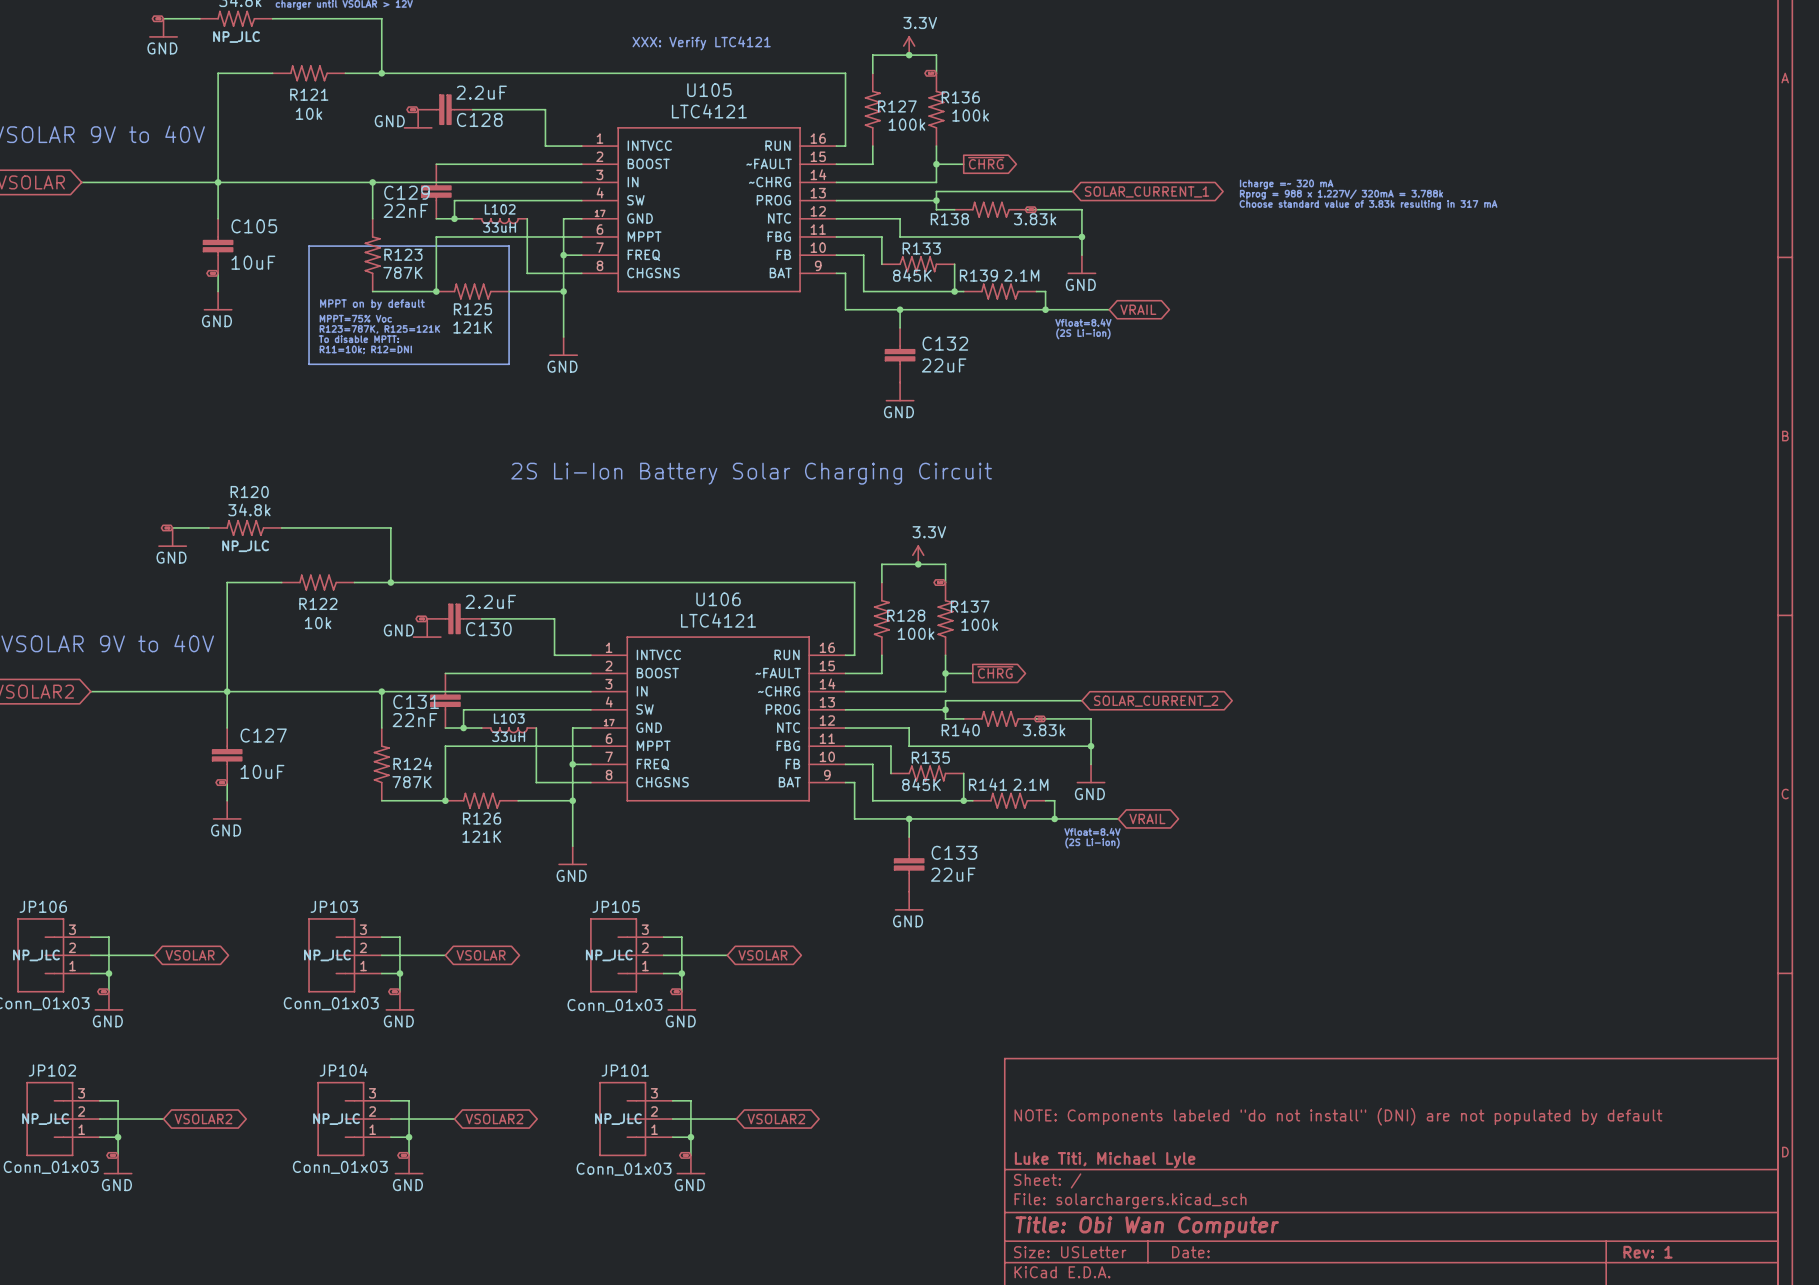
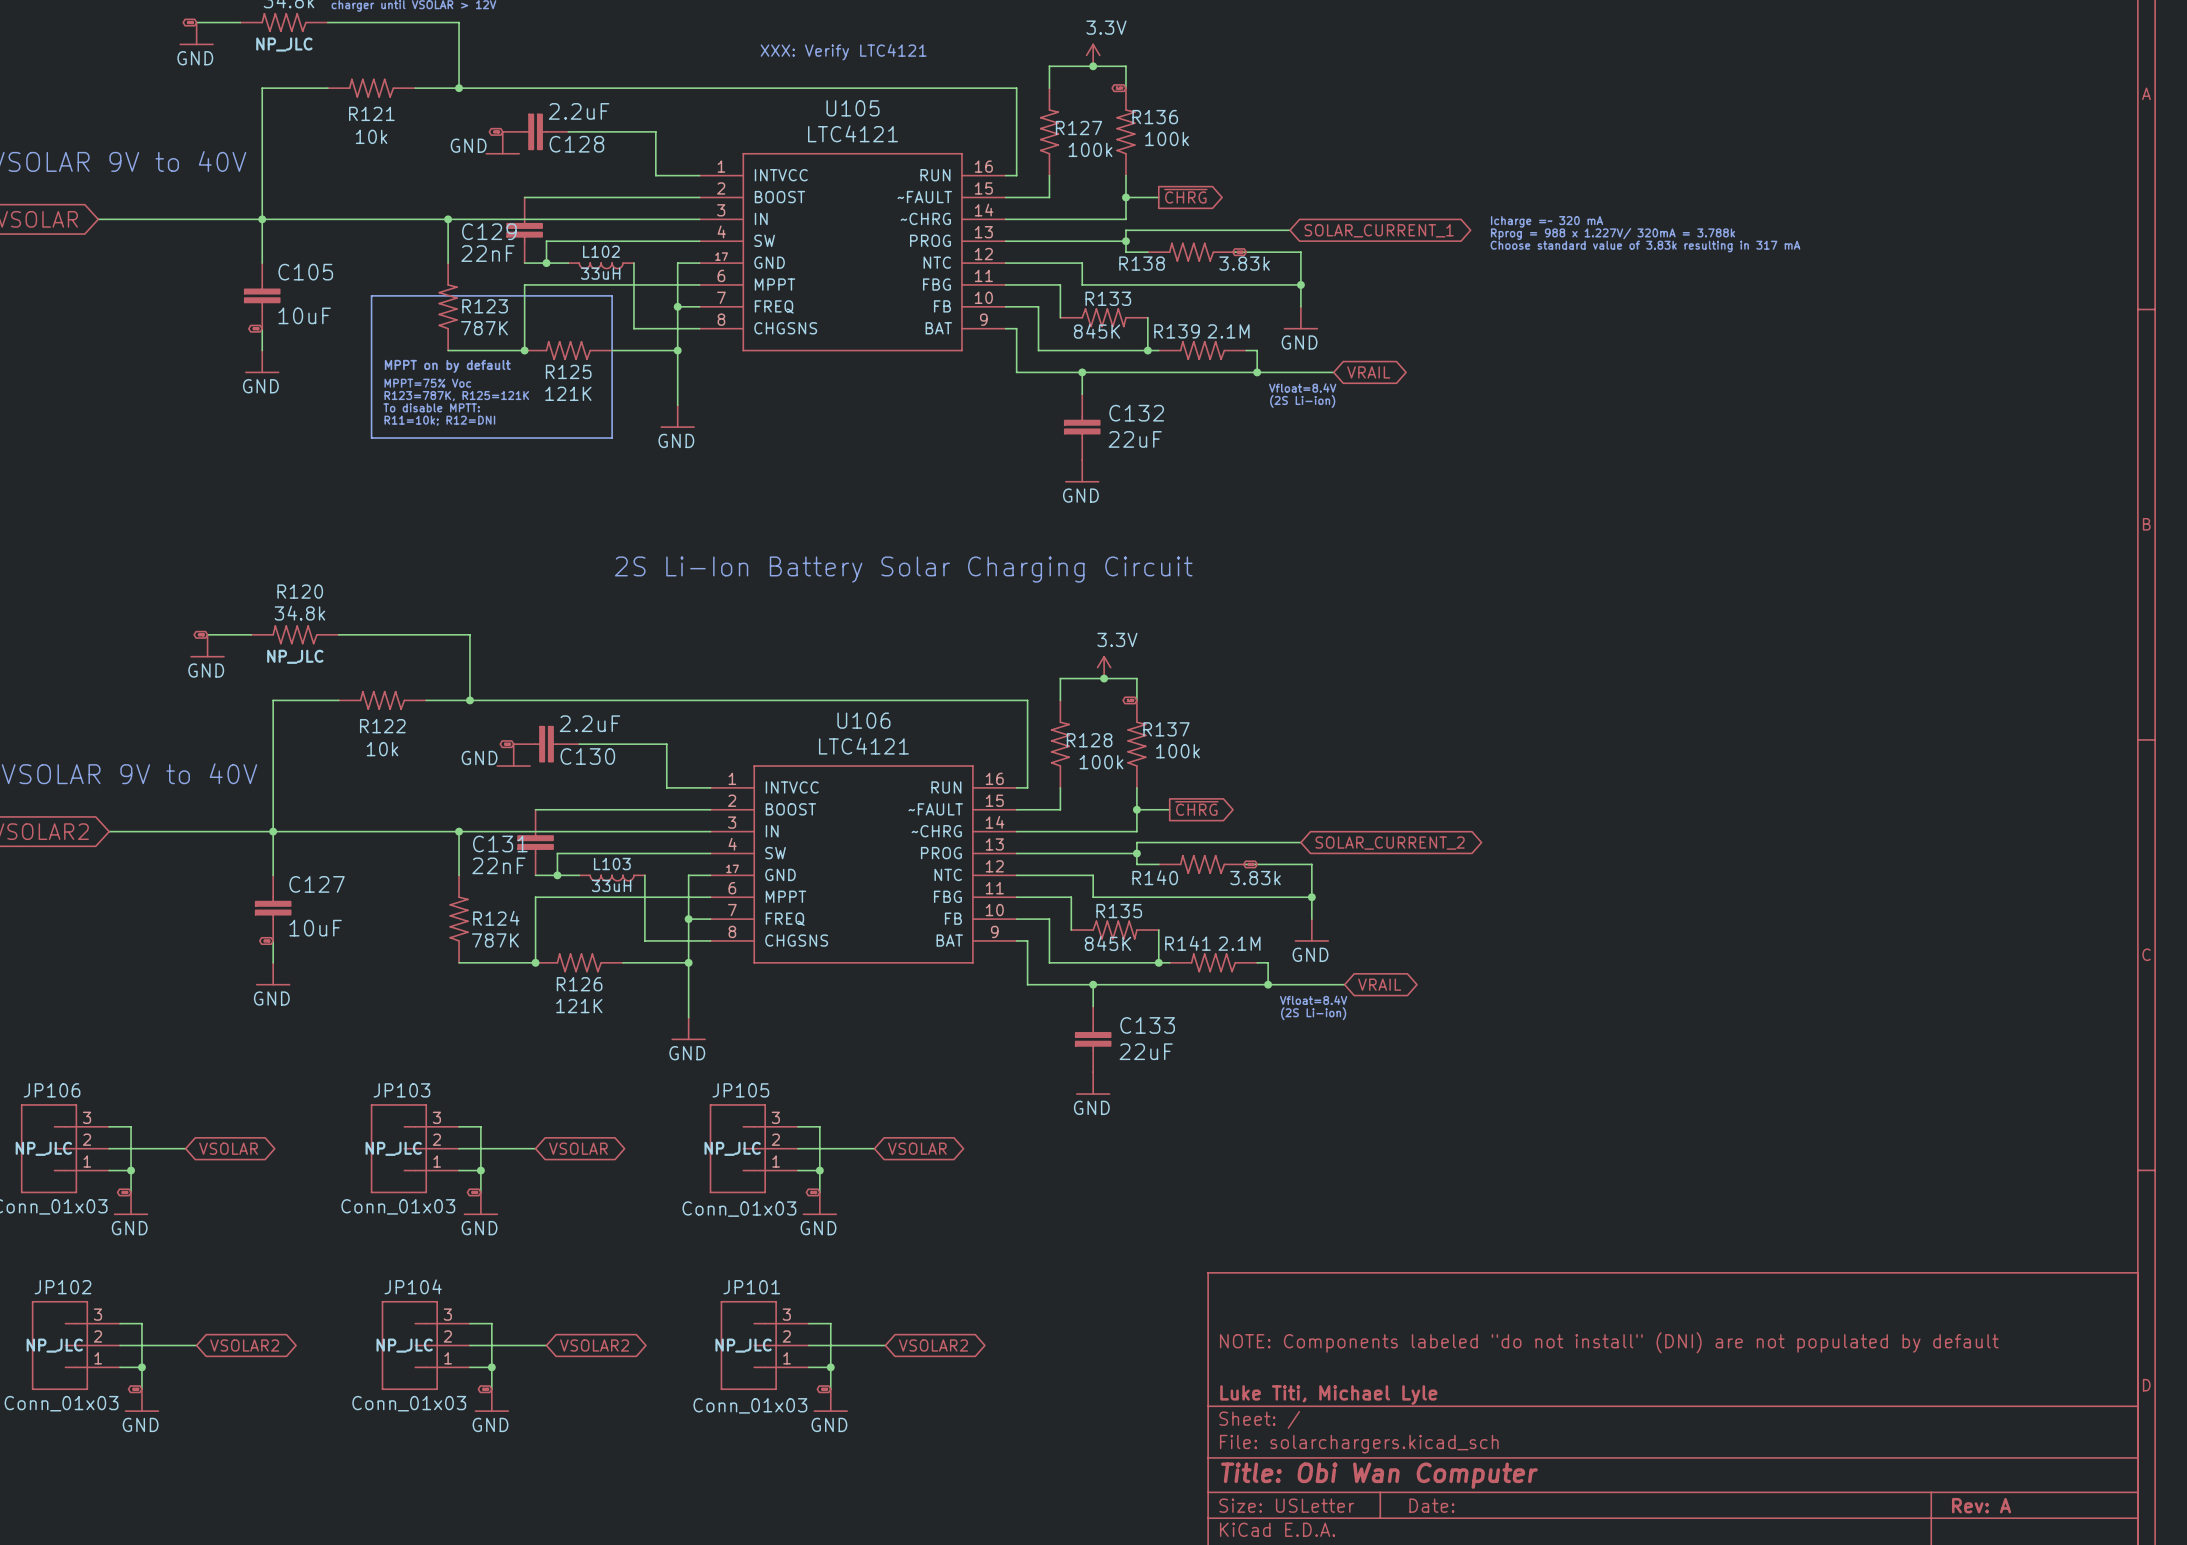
title block: Rev: 1 (1648, 1252) -> Rev: A (1981, 1505)

